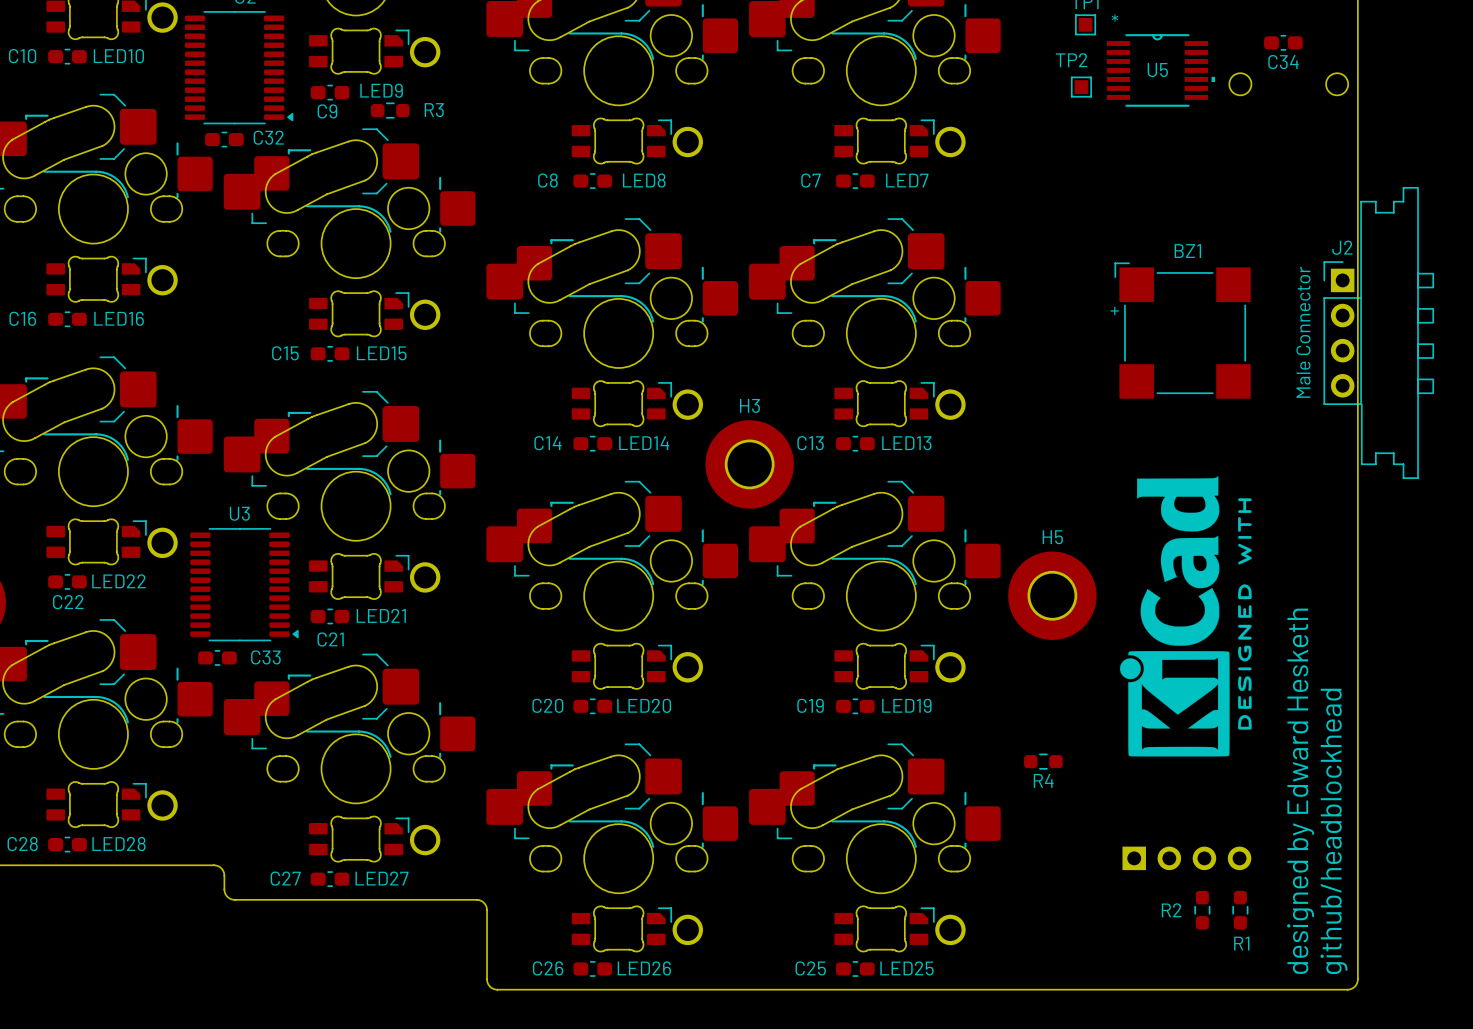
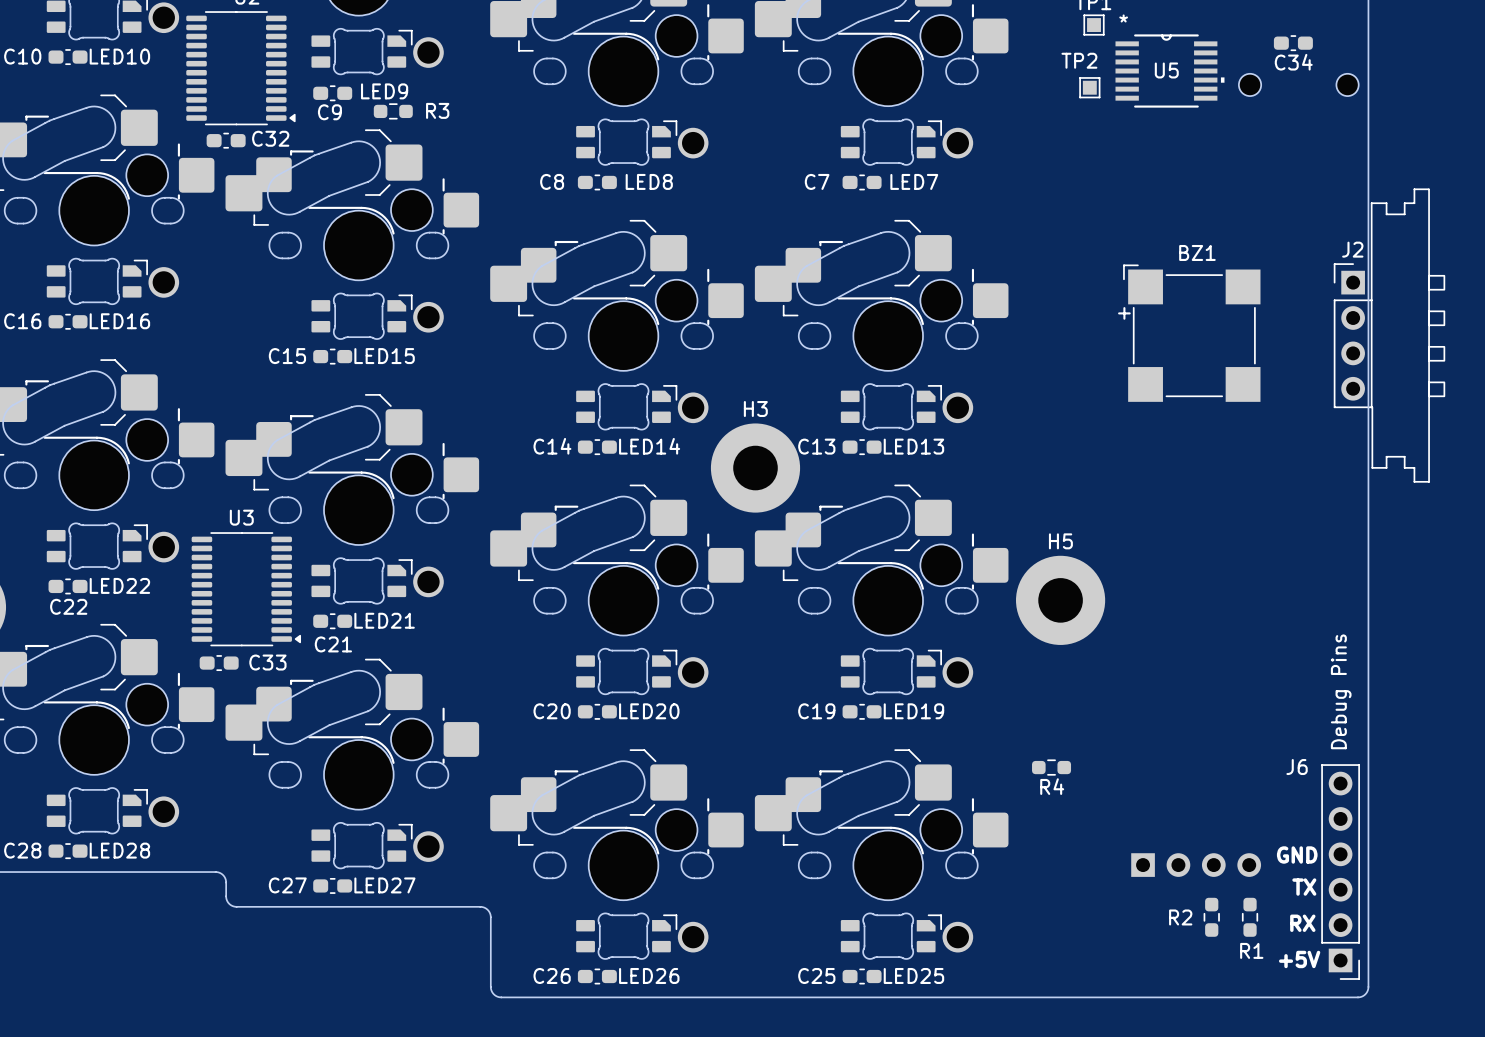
text: Male Connector (1303, 332) -> none
drawing: [1119, 476, 1252, 757] -> none
text: none -> Debug Pins (1341, 691)
text: designed by Edward Hesketh (1300, 791) -> none
text: github/headblockhead (1333, 831) -> none
text: none -> GND (1297, 854)
J6: none -> (1340, 872)
text: none -> TX (1304, 887)
text: none -> RX (1302, 923)
text: none -> +5V (1299, 959)

